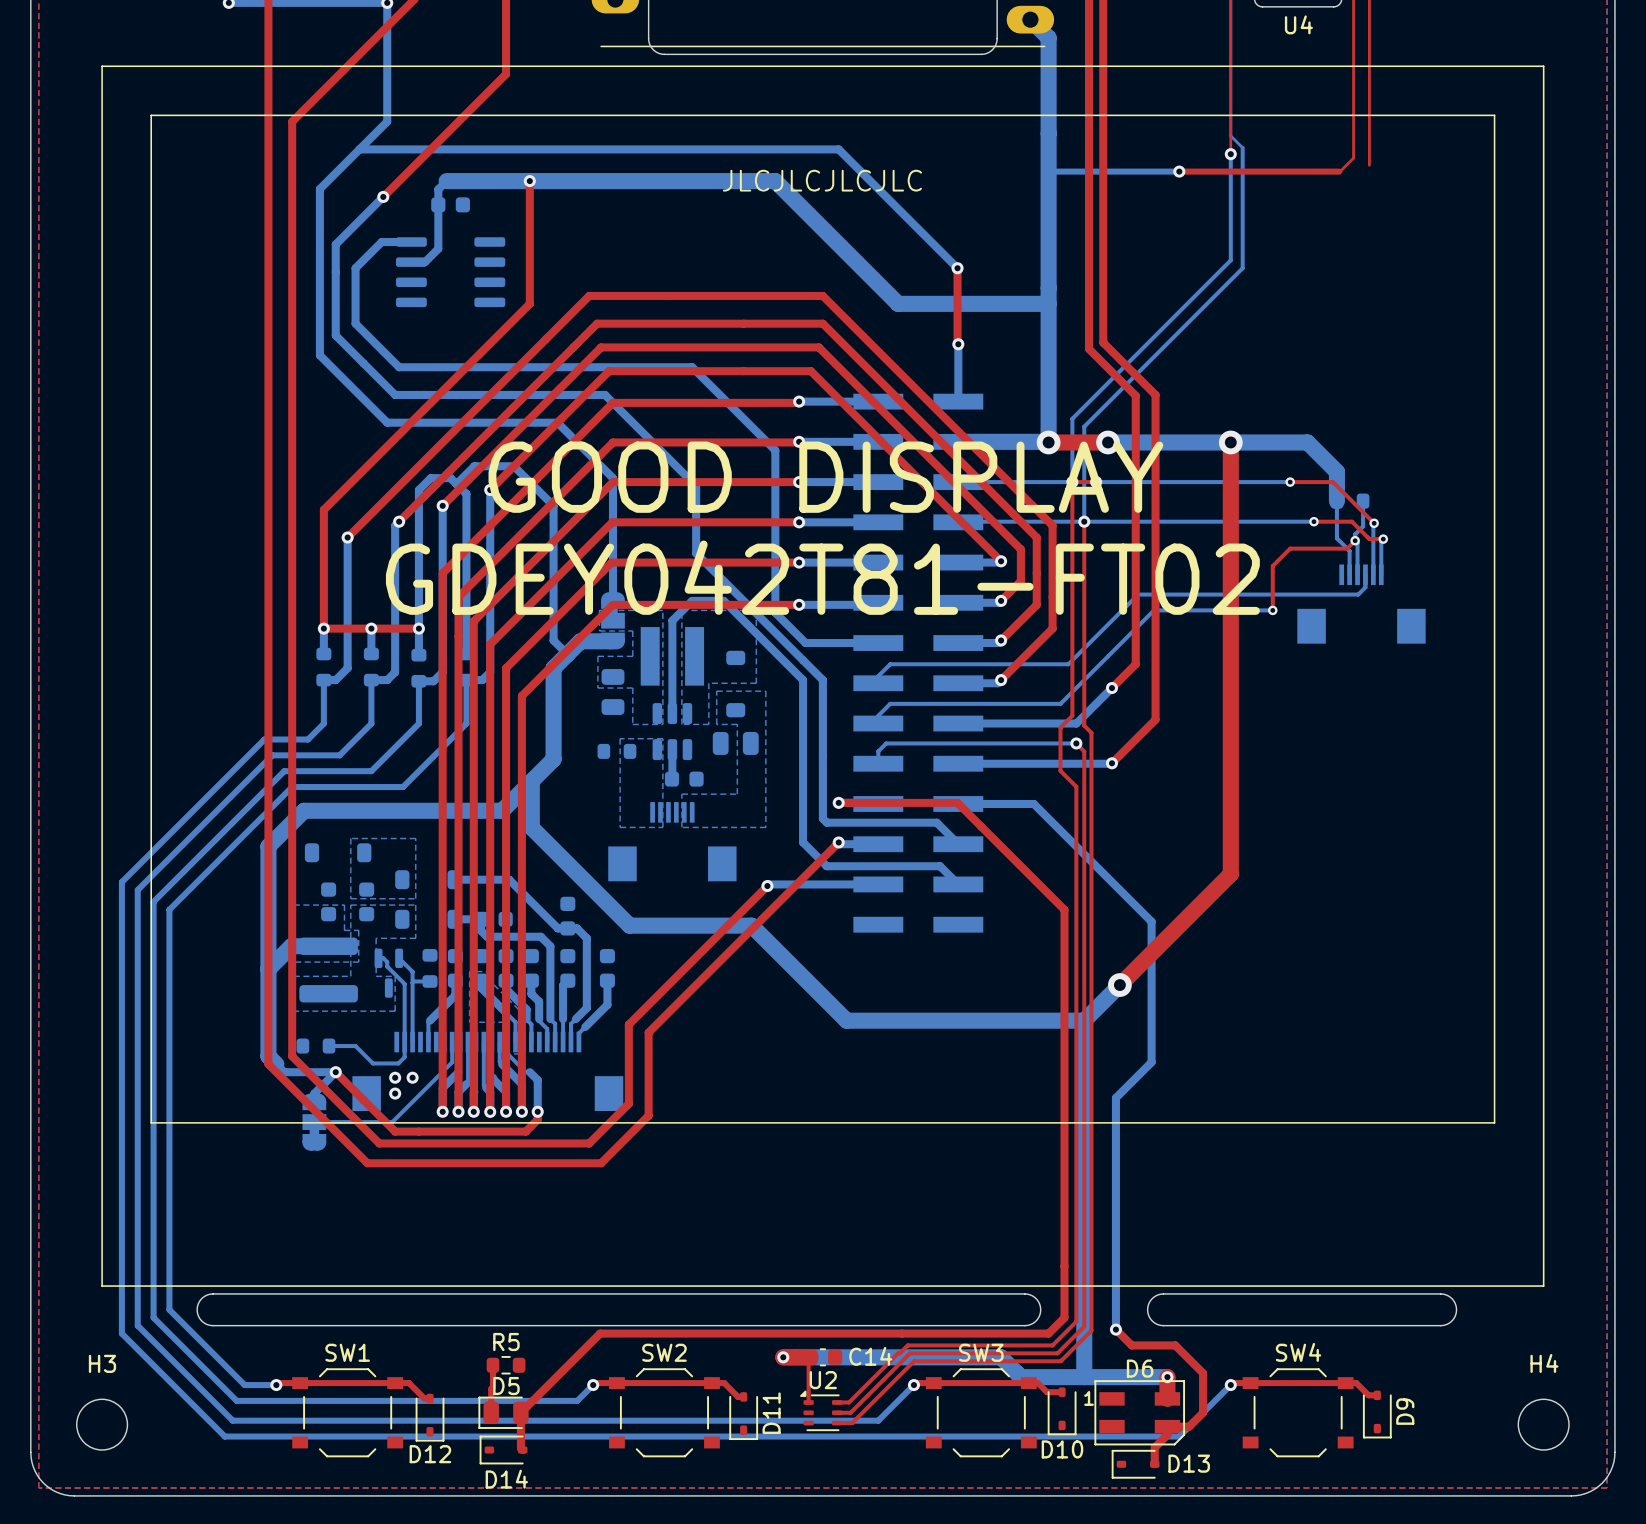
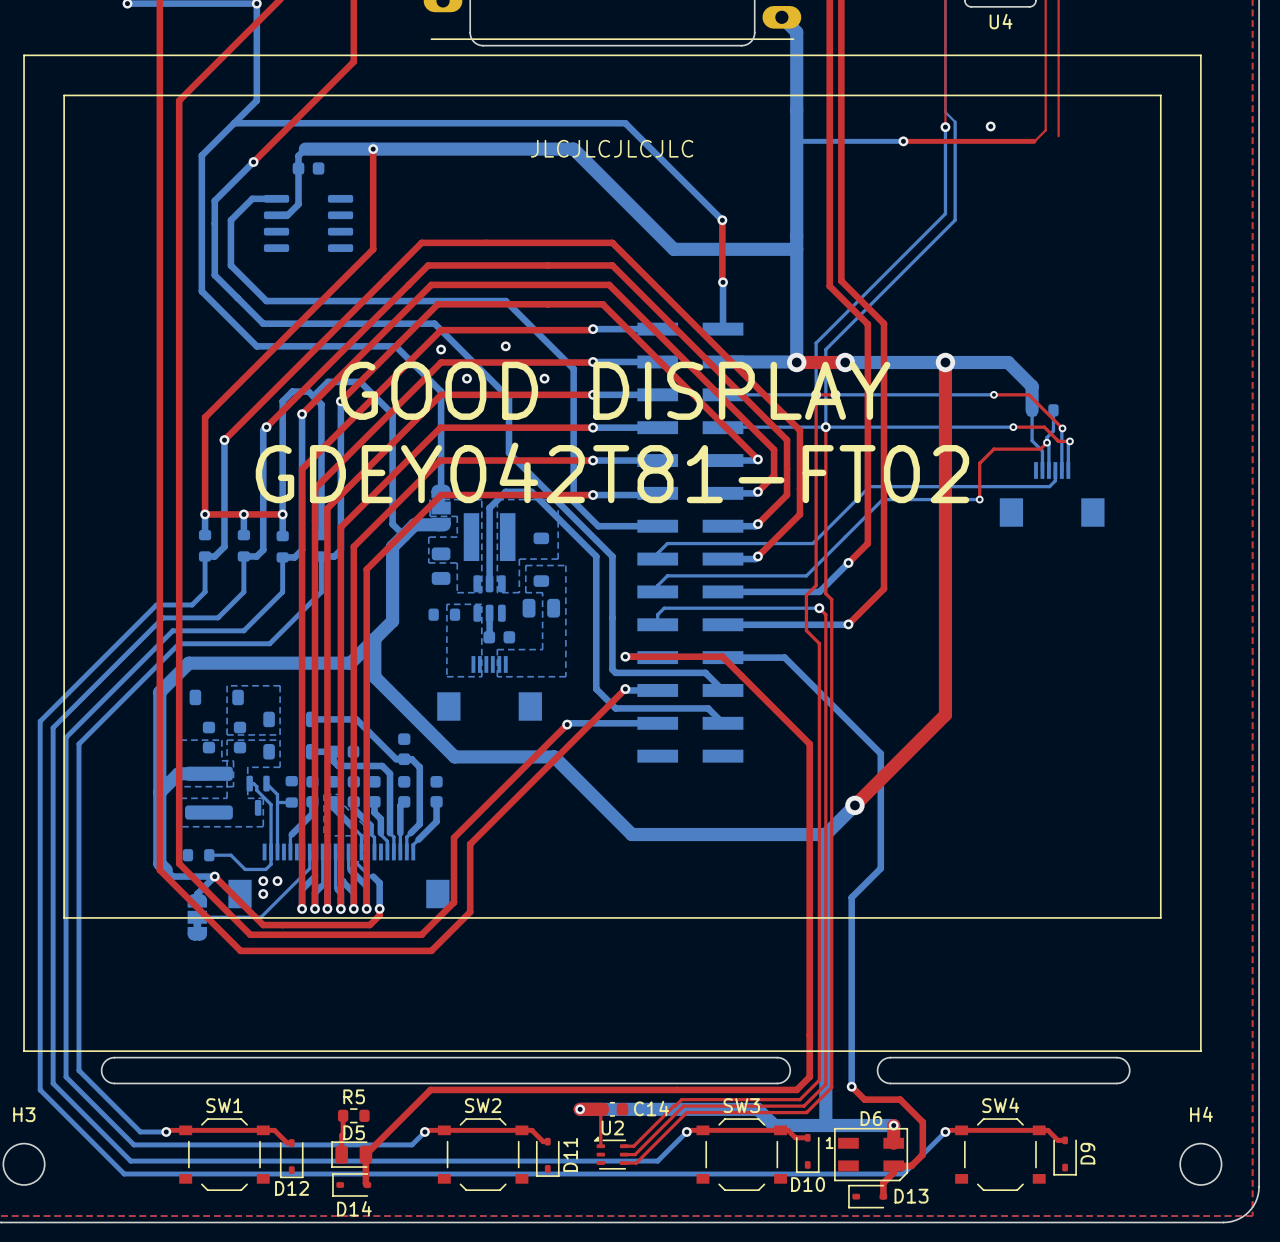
via: none -> (990, 126)
via: none -> (505, 346)
via: none -> (441, 349)
via: none -> (466, 378)
via: none -> (544, 378)

